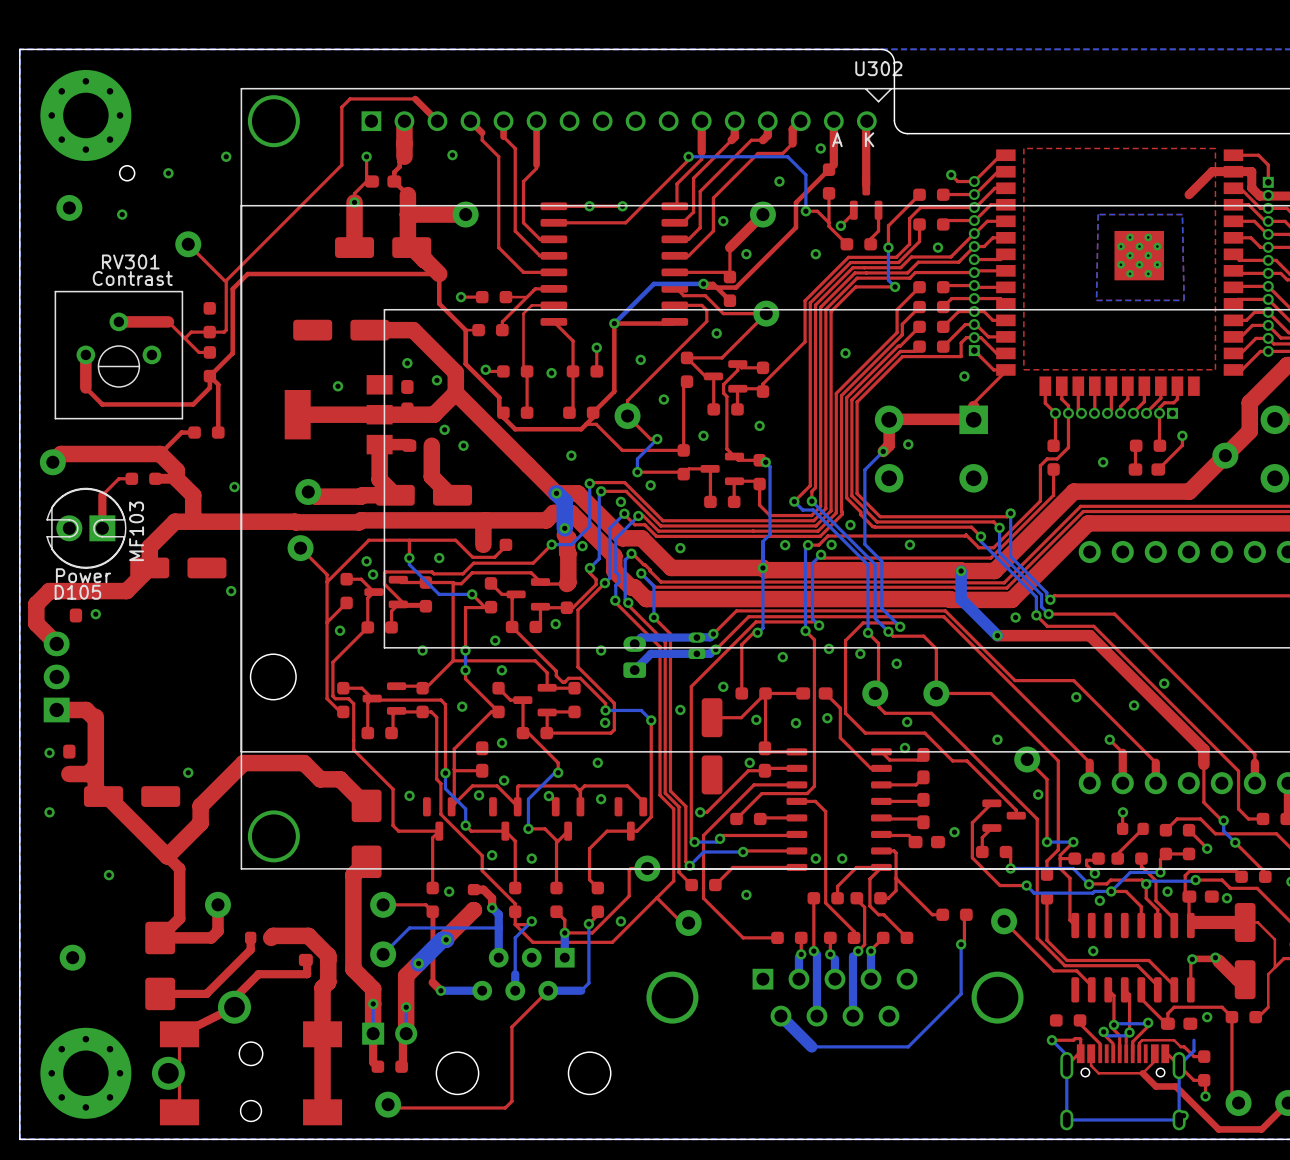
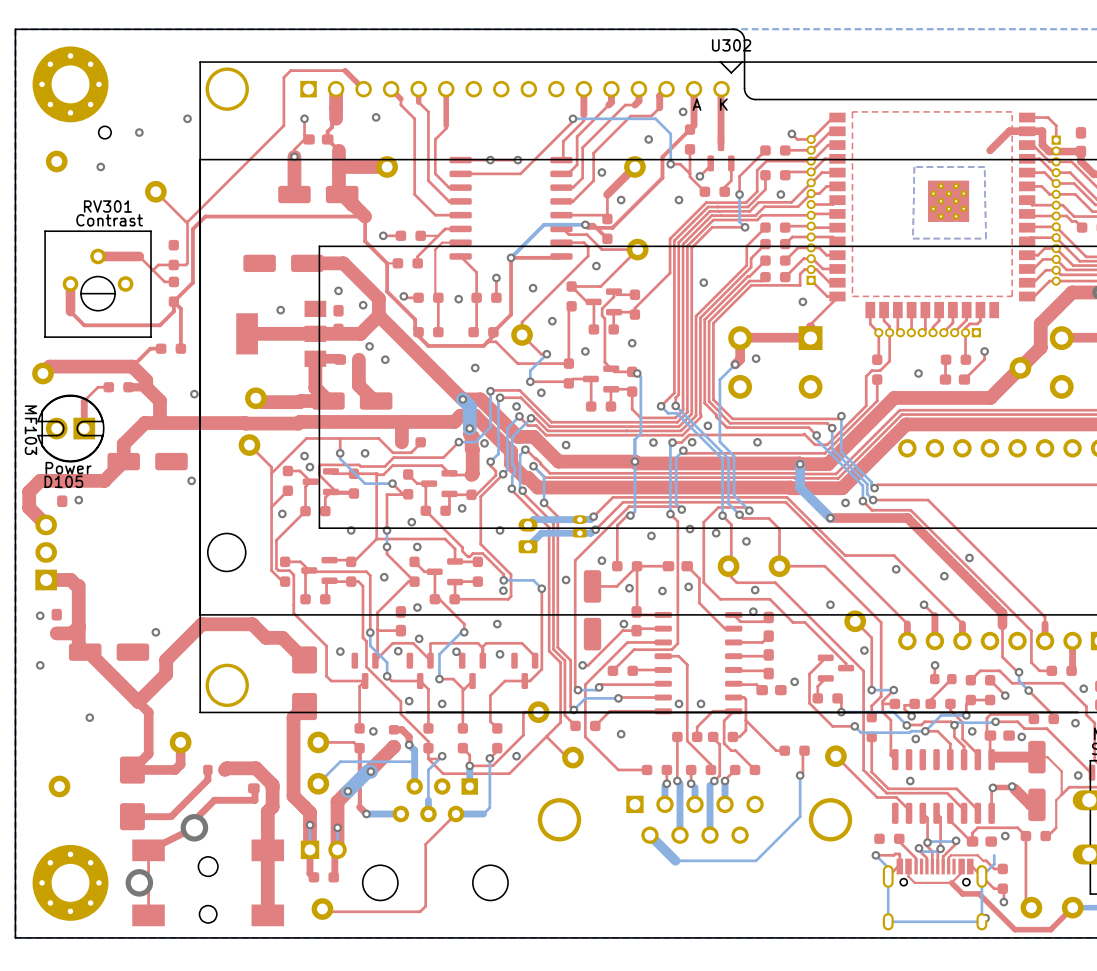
MF103 name rotation: 0° (136, 531) -> 180° (30, 430)
MF103 name position: MF103 (136, 531) -> MF103 (30, 430)

